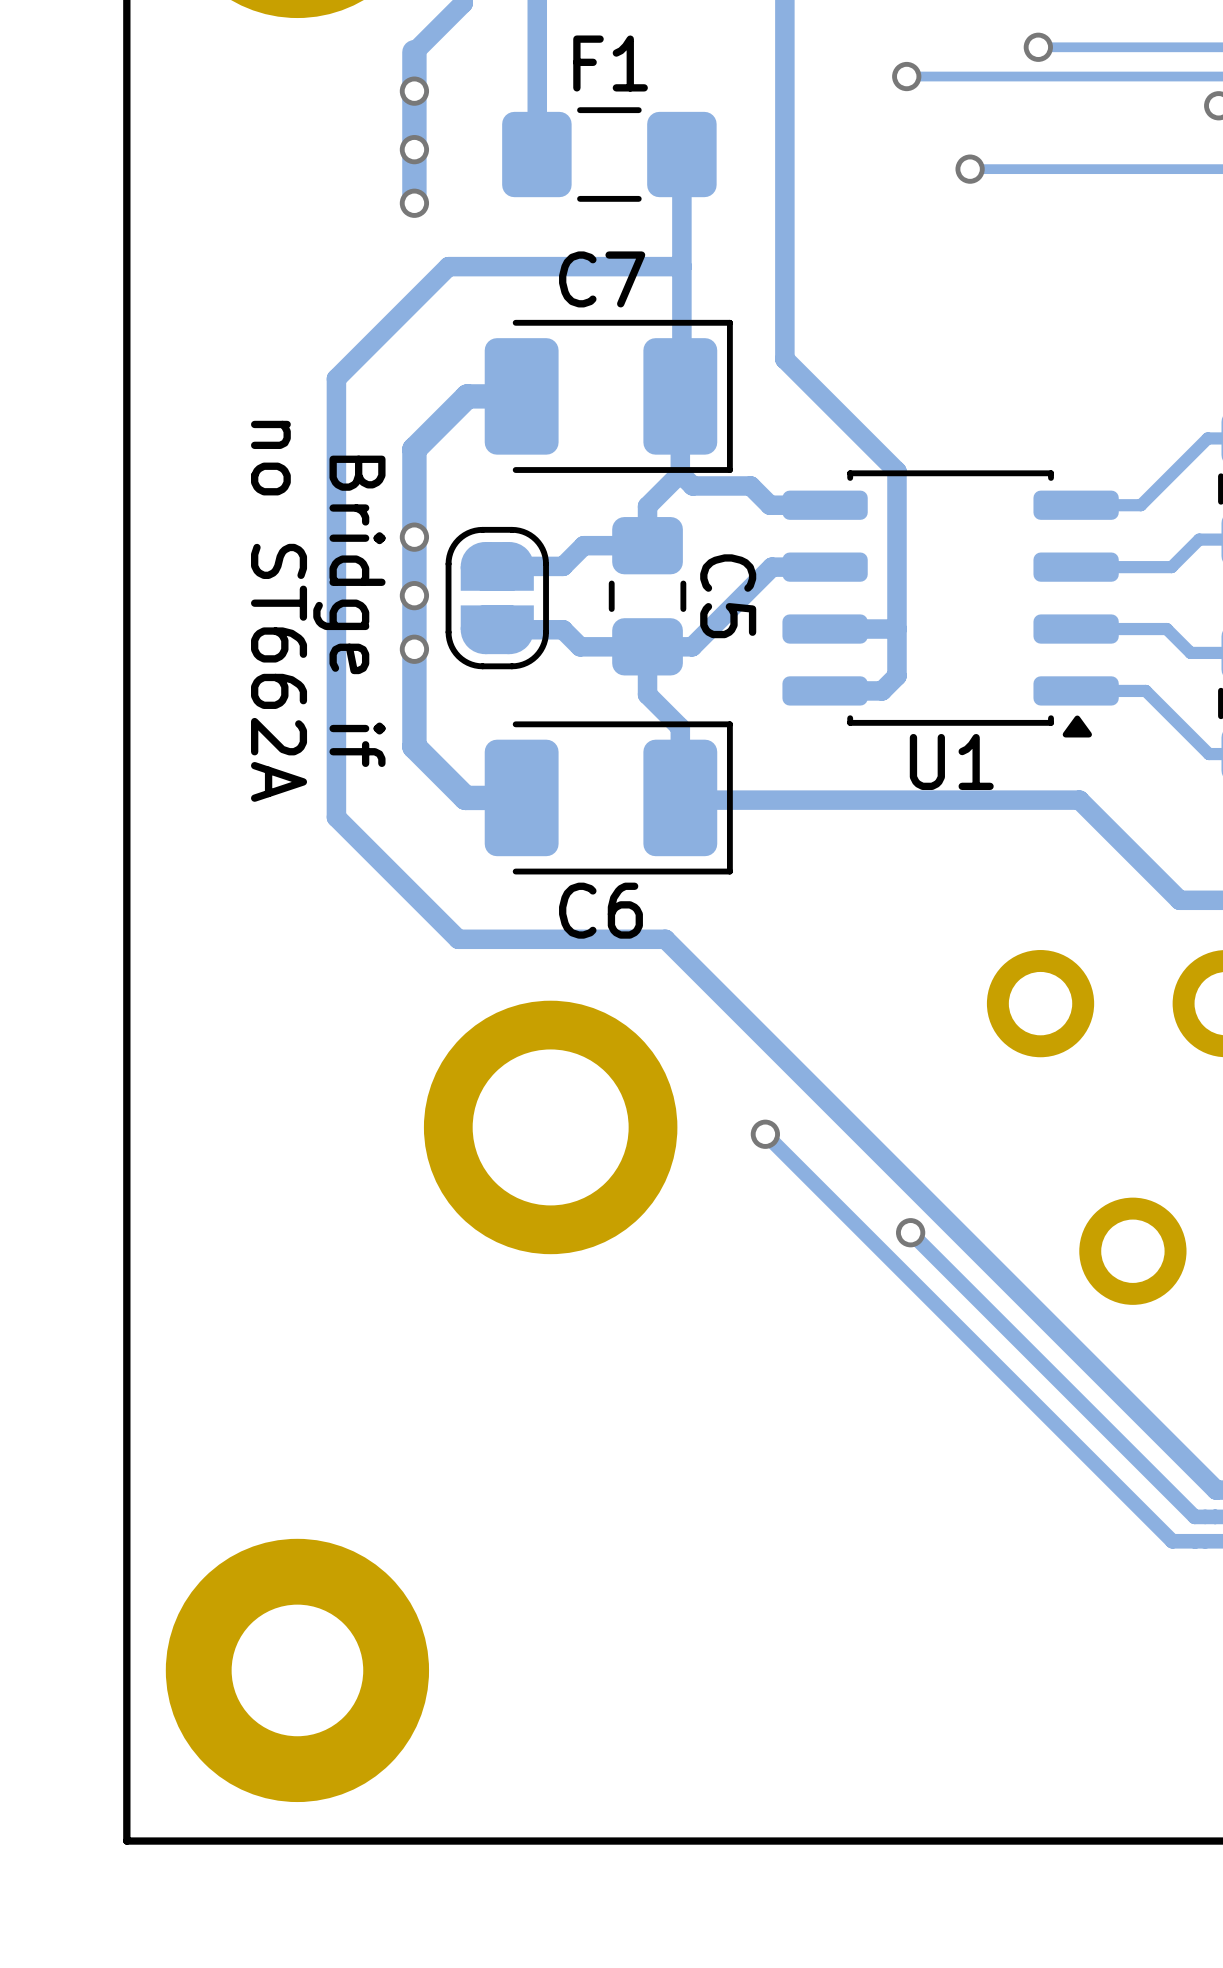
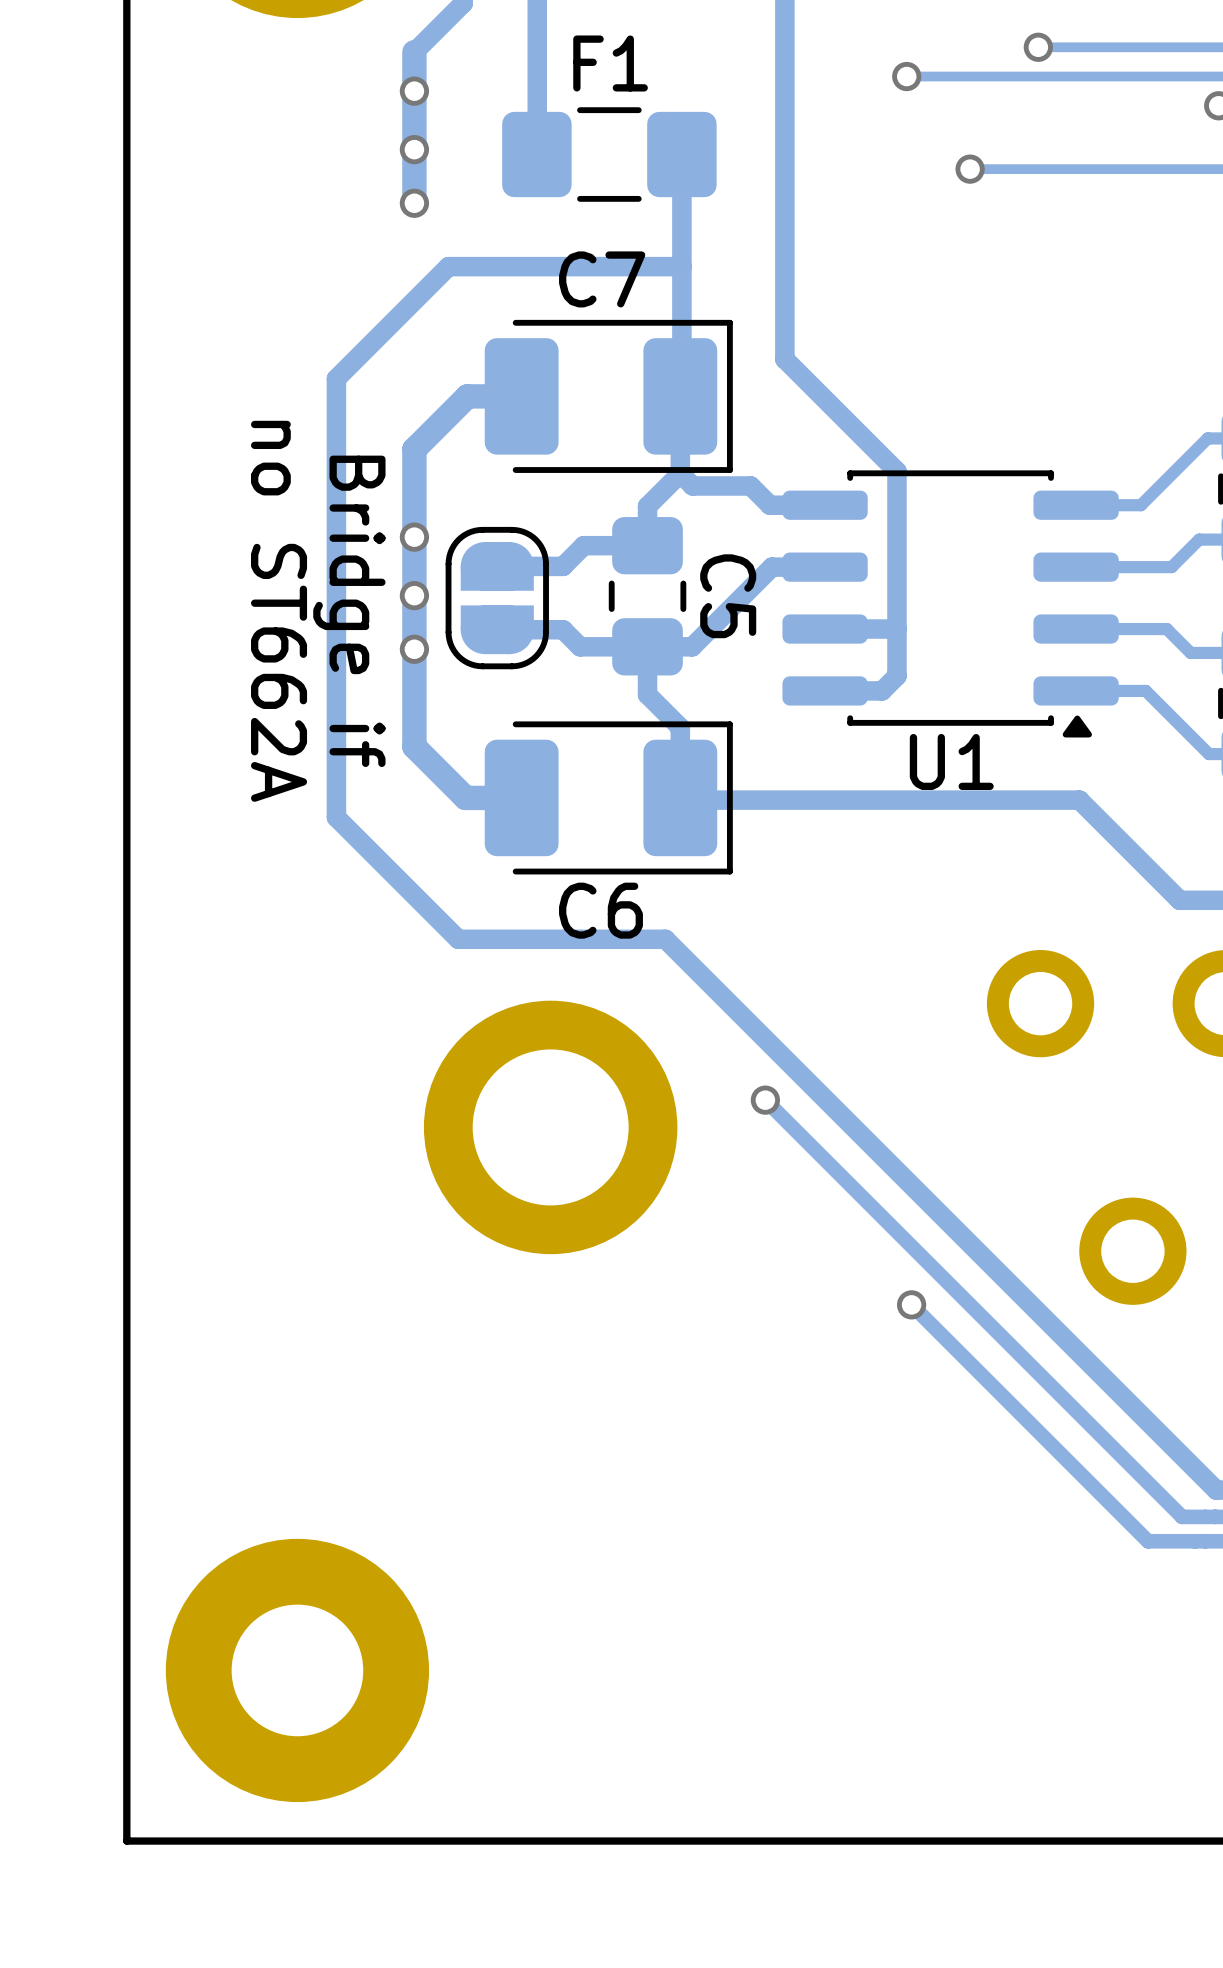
track: (765, 1134) (1172, 1541) -> (911, 1304) (1148, 1541) (1172, 1541)
via position: (765, 1134) -> (765, 1100)
track: (910, 1232) (1194, 1516) -> (765, 1100) (1182, 1516) (1194, 1516)
via position: (910, 1232) -> (911, 1304)

